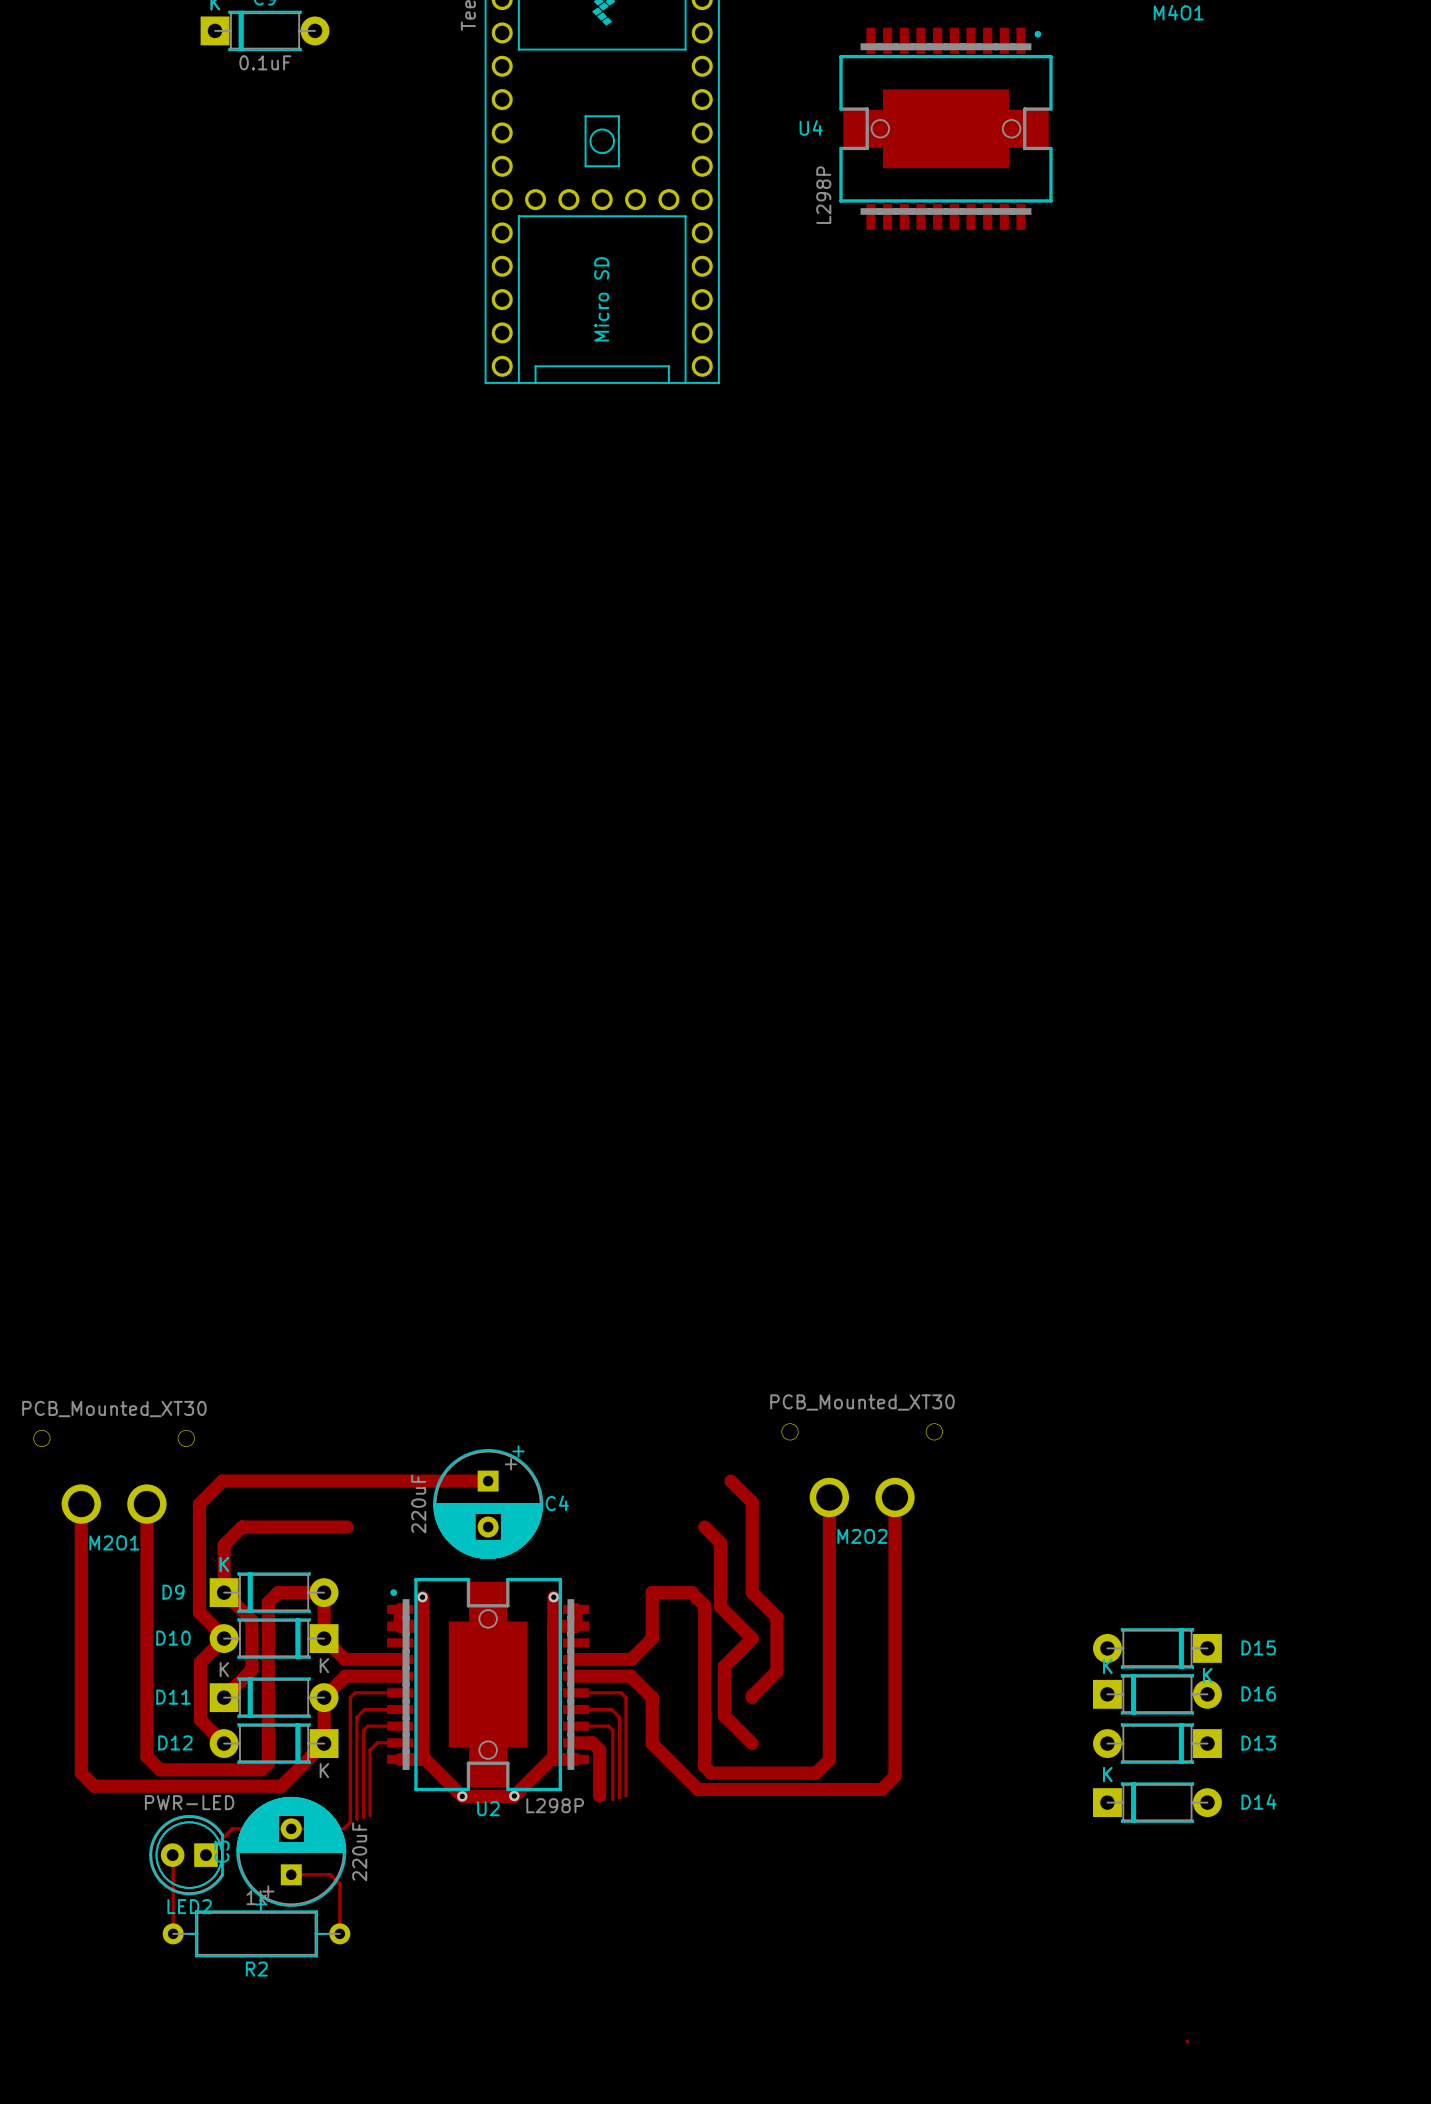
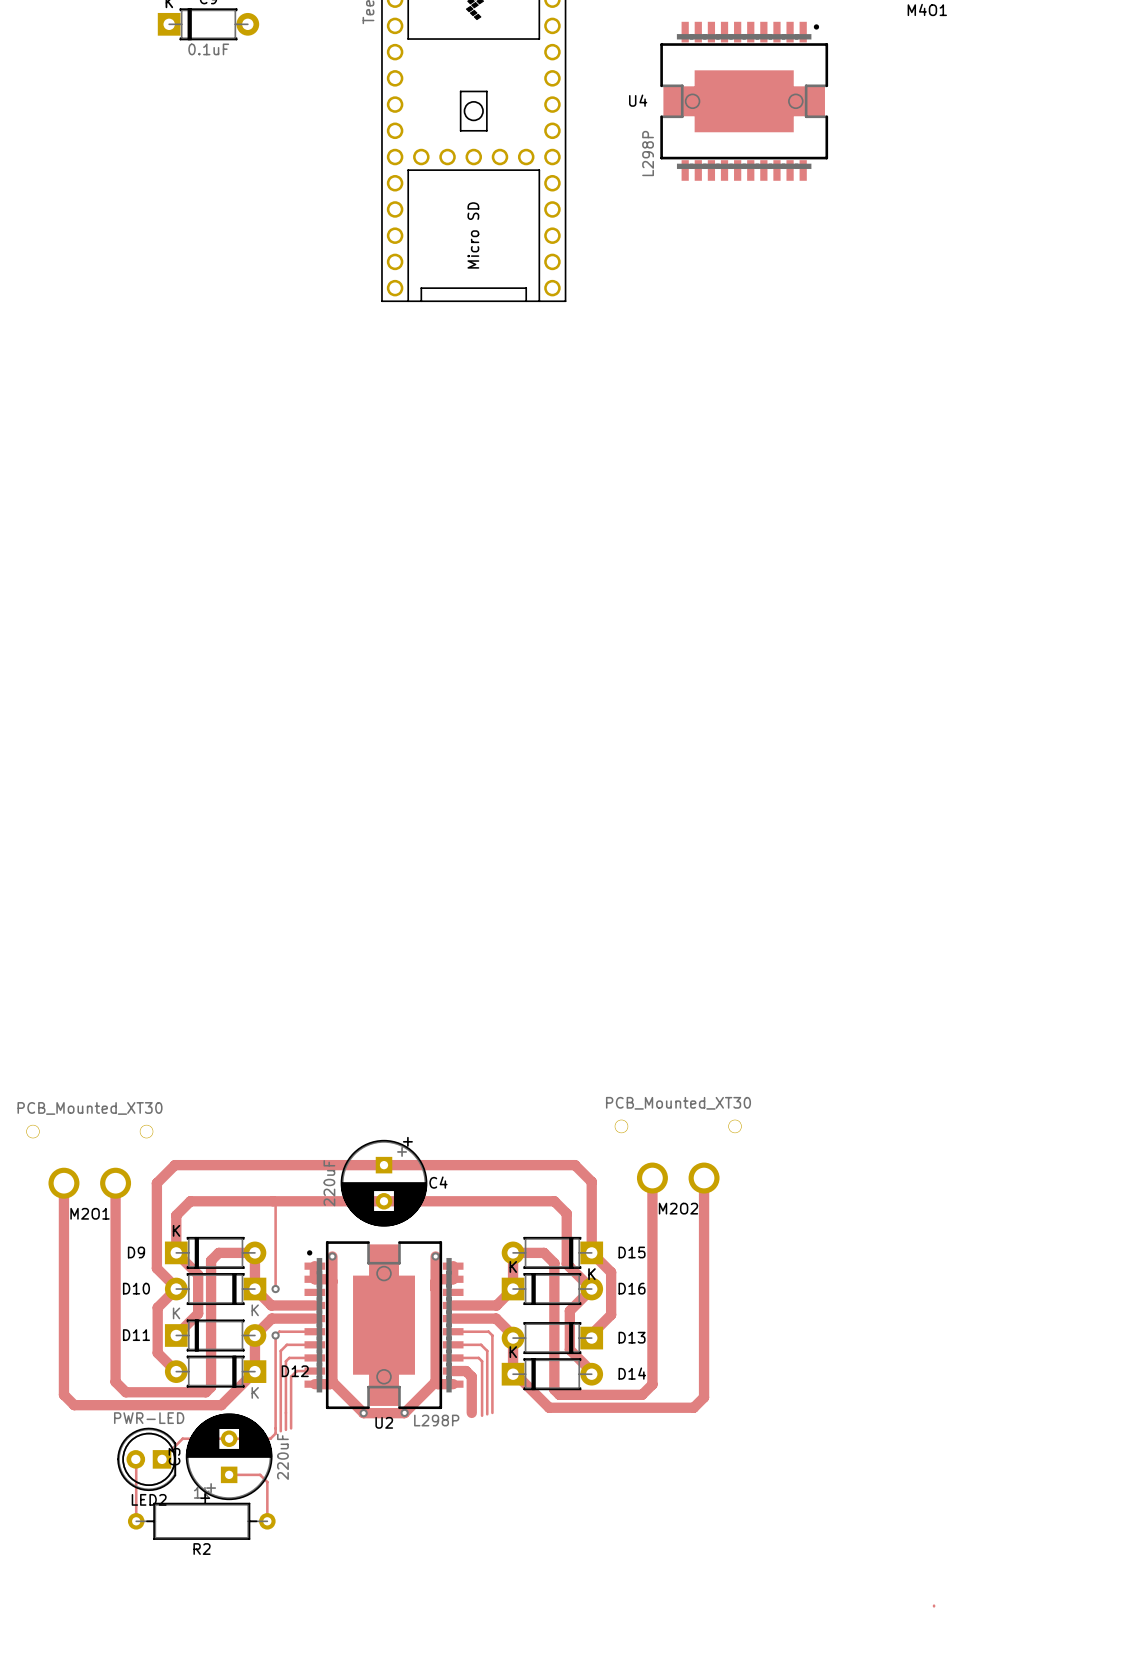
track: none -> (384, 1165) (575, 1165)
track: none -> (273, 1201) (554, 1201)
track: none -> (275, 1203) (275, 1289)
via: none -> (275, 1289)
D15 position: (1157, 1648) -> (552, 1252)
D16 position: (1157, 1694) -> (552, 1289)
via: none -> (275, 1335)
D12 name position: D12 (175, 1742) -> D12 (295, 1371)
D13 position: (1157, 1743) -> (552, 1338)
D14 position: (1157, 1802) -> (552, 1374)

